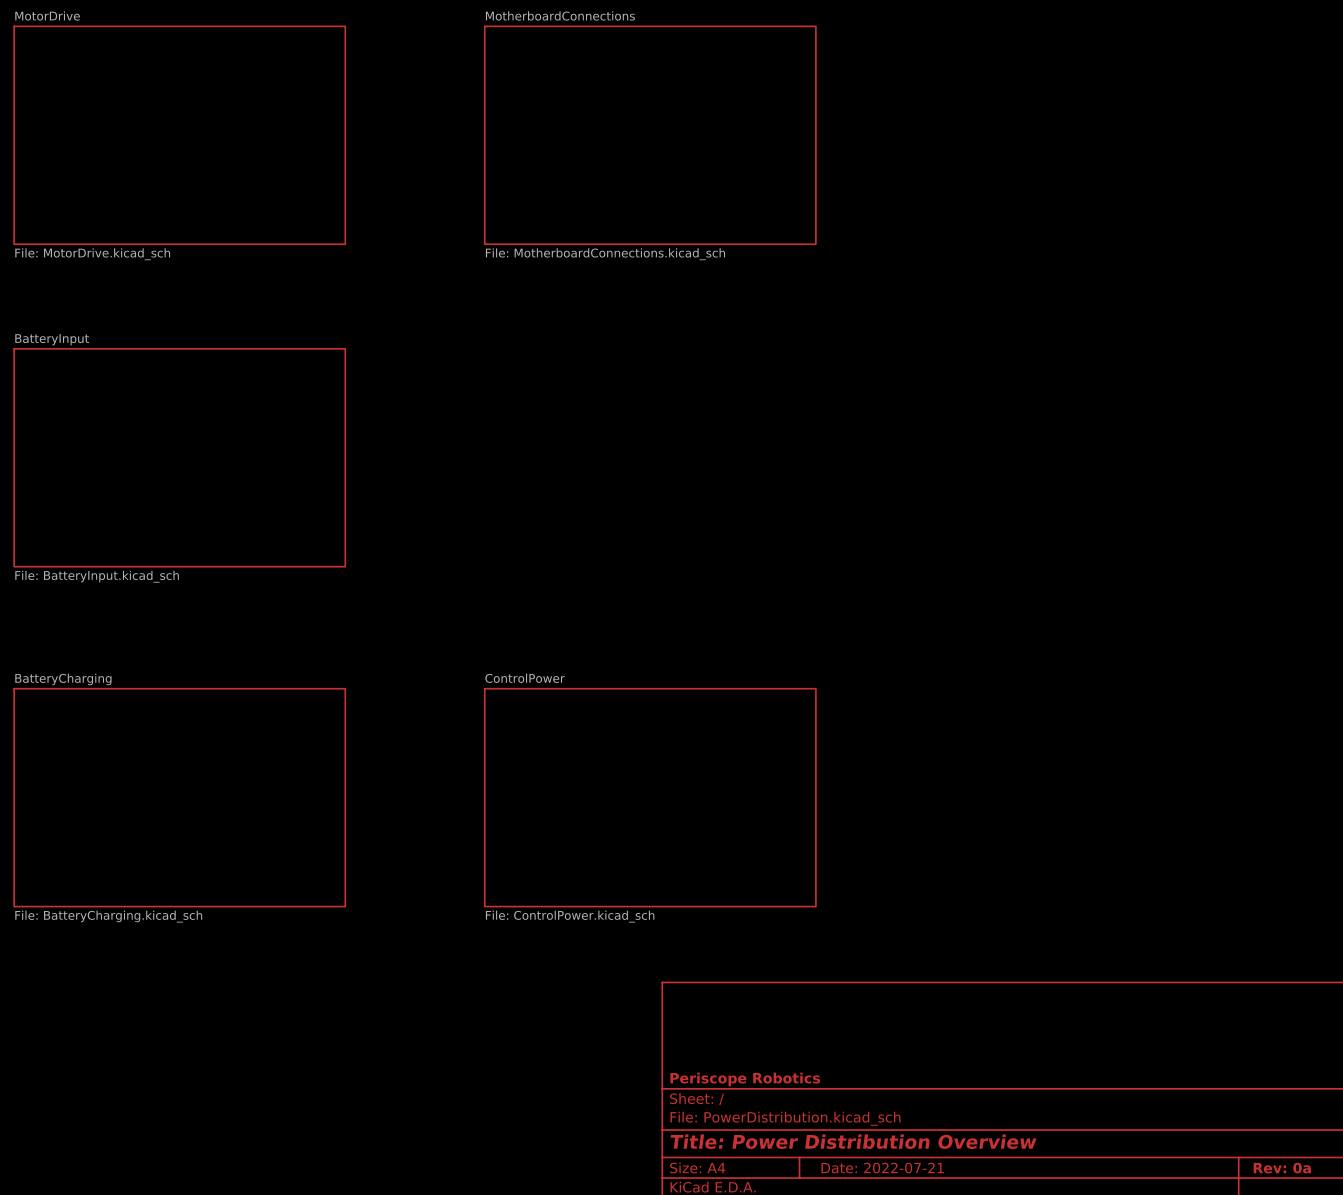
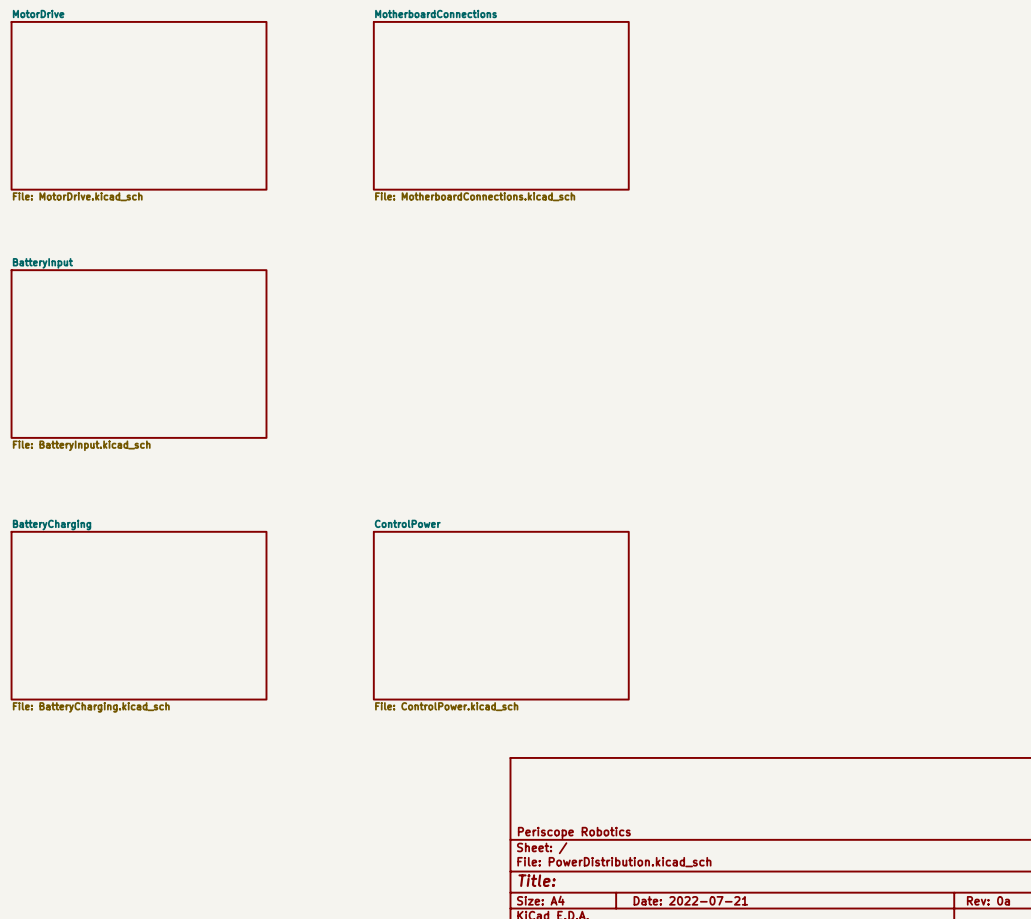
title block: Title: Power Distribution Overview (853, 1141) -> Title: (537, 880)

